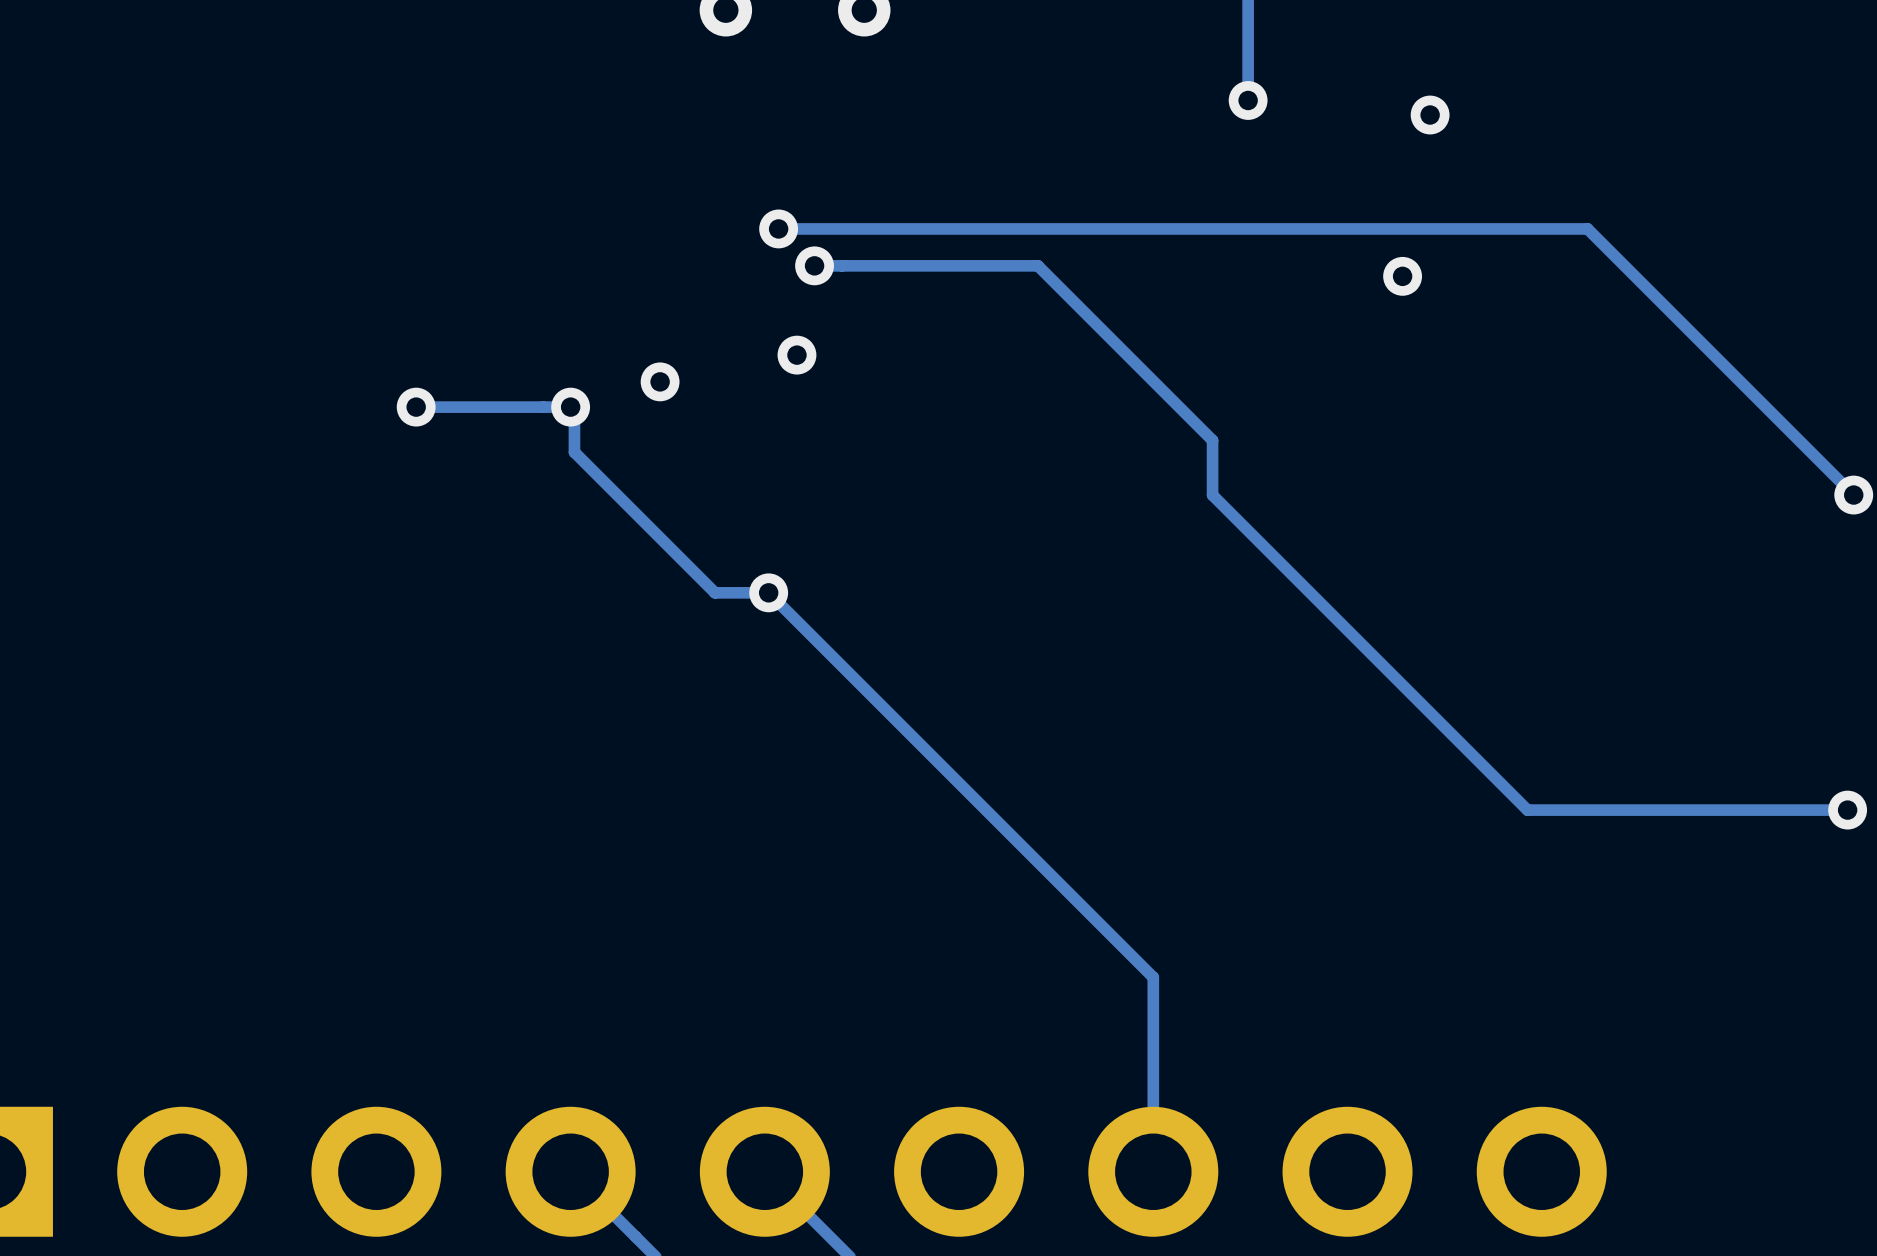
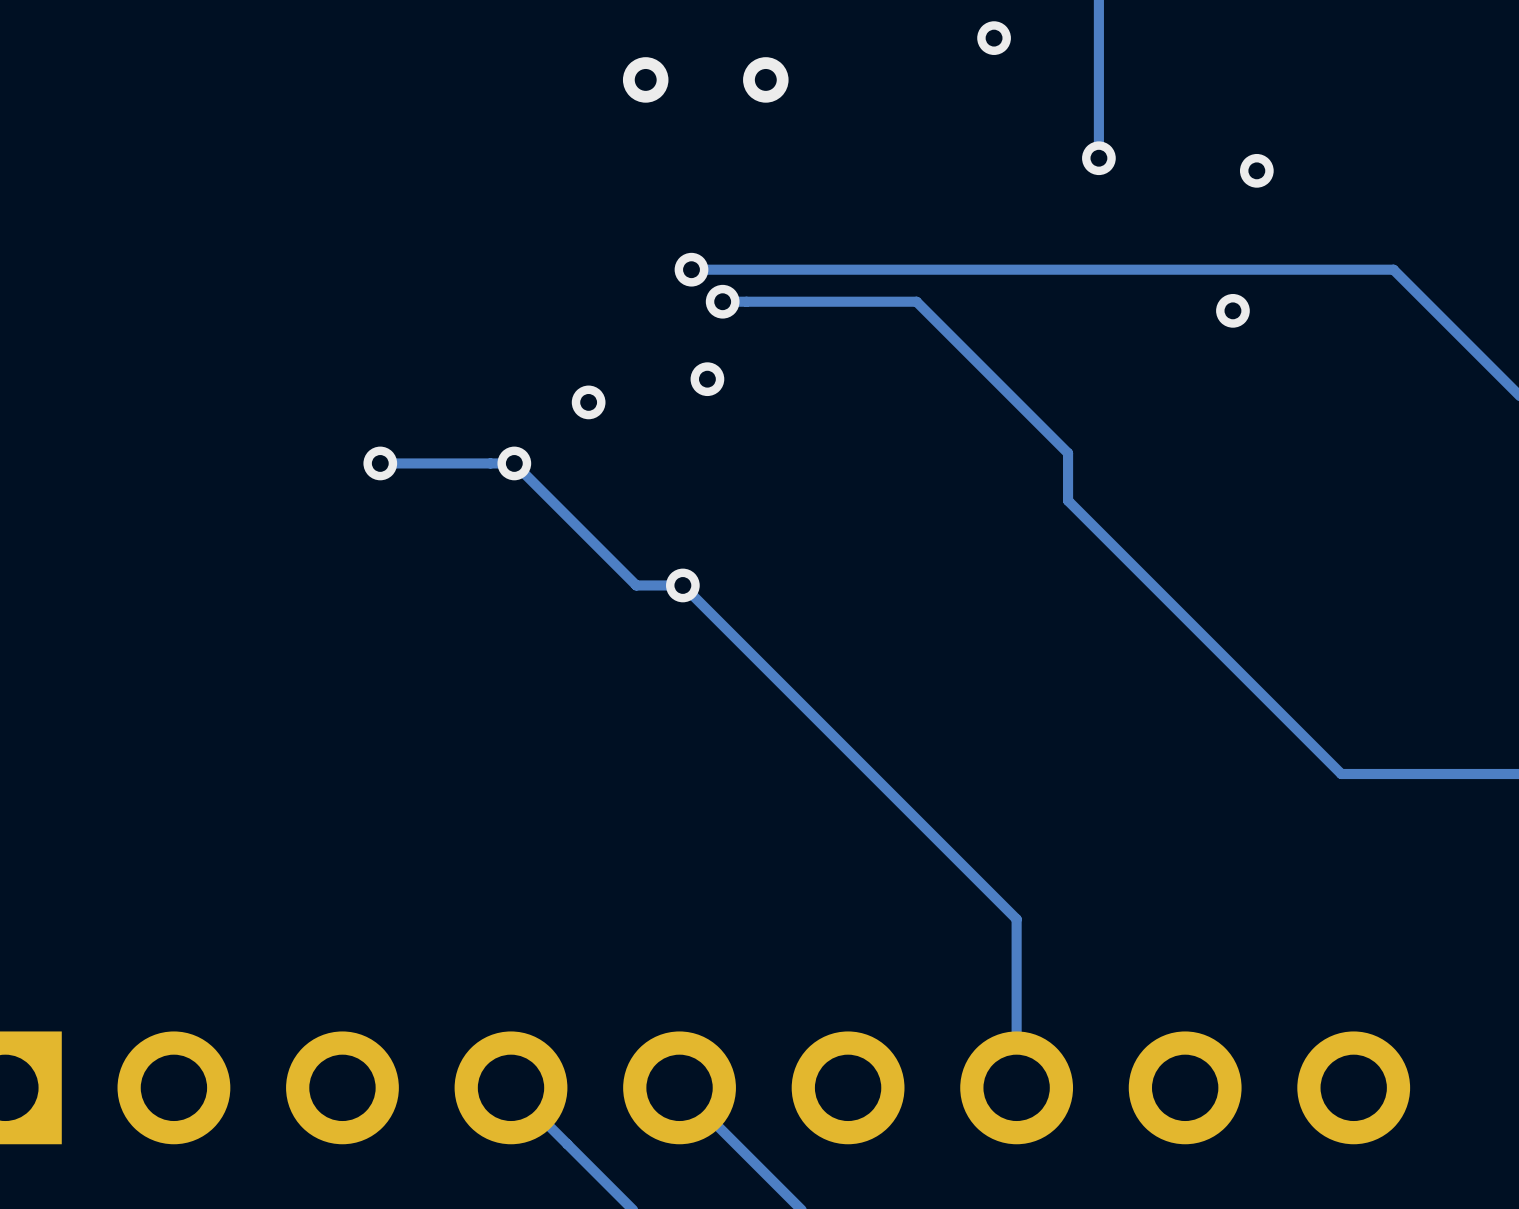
track: (416, 407) (570, 407) (574, 410) (574, 452) -> (380, 463) (514, 463)
via position: (416, 407) -> (380, 463)
via position: (570, 407) -> (514, 463)

